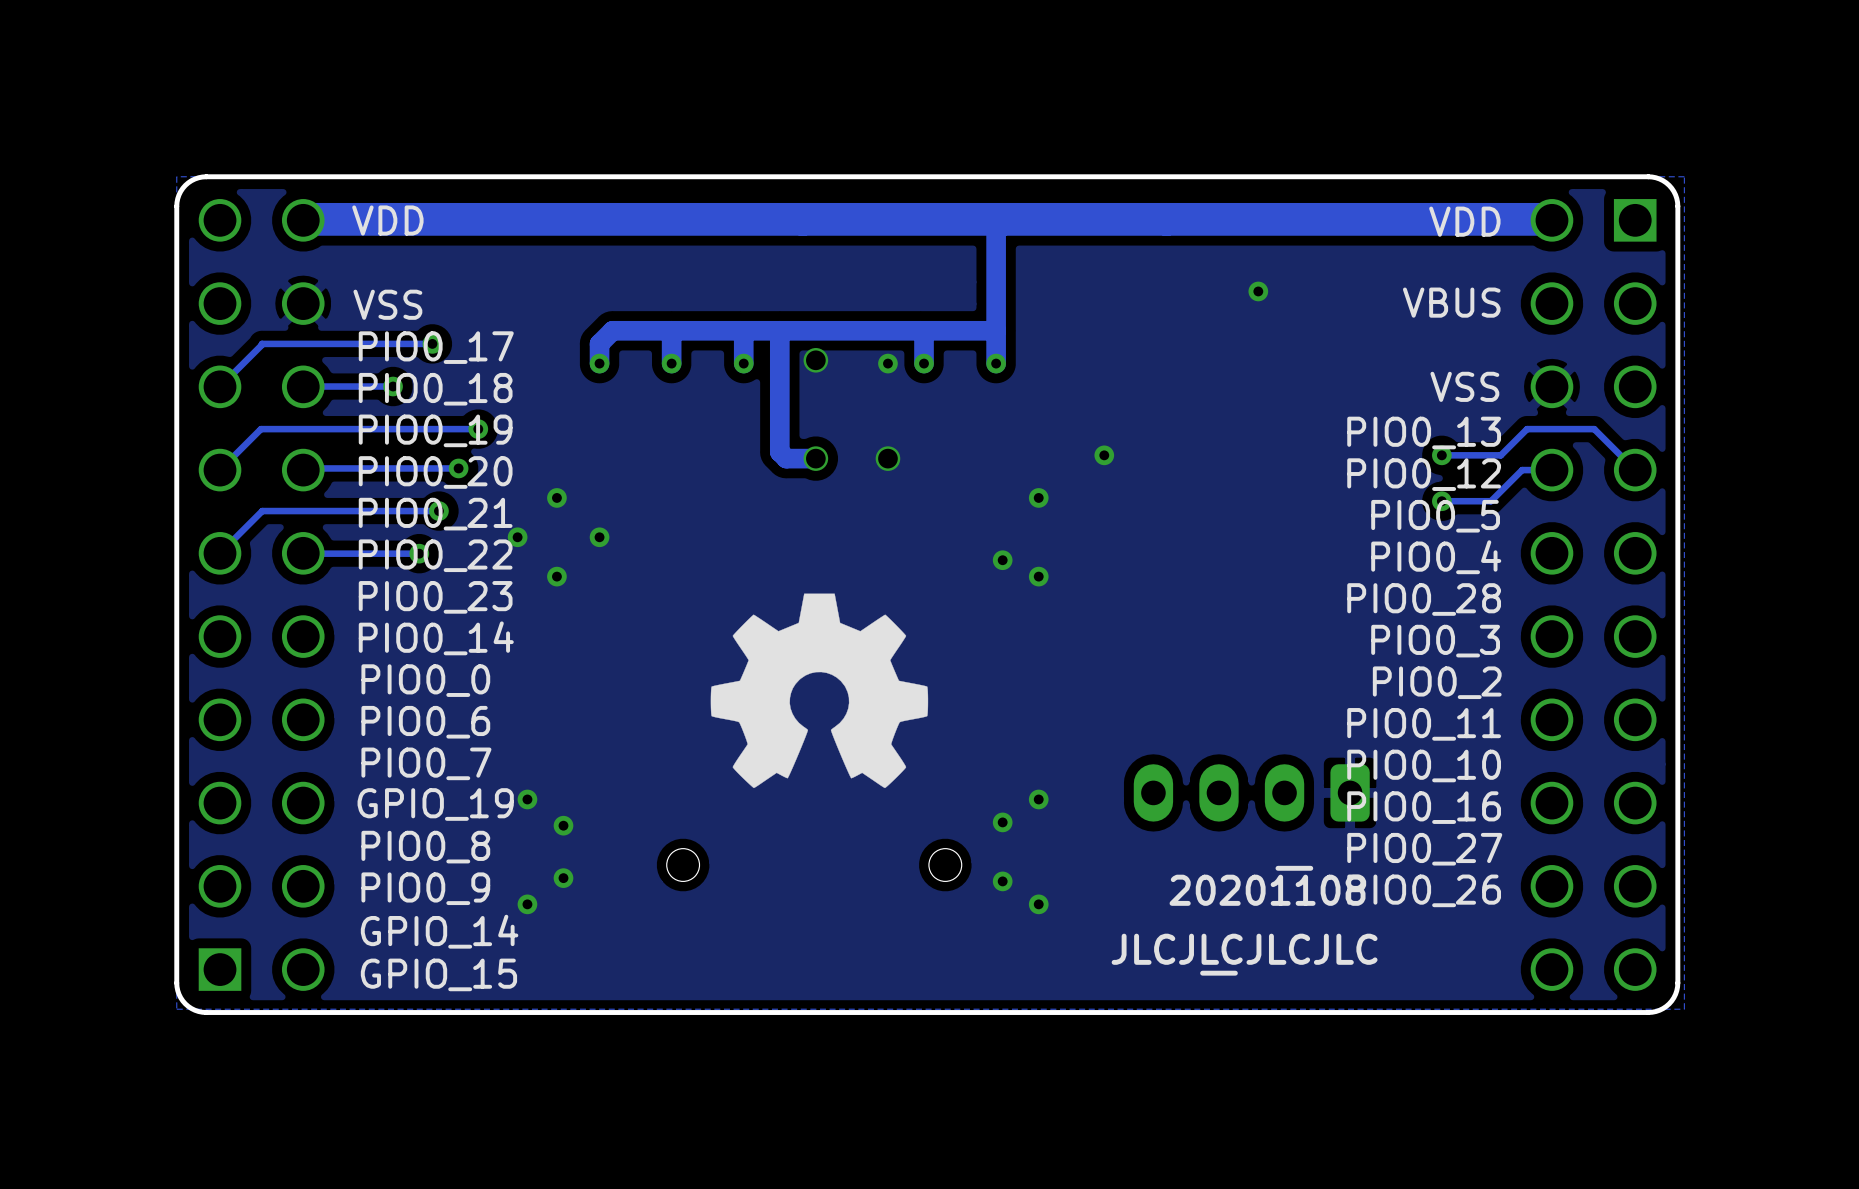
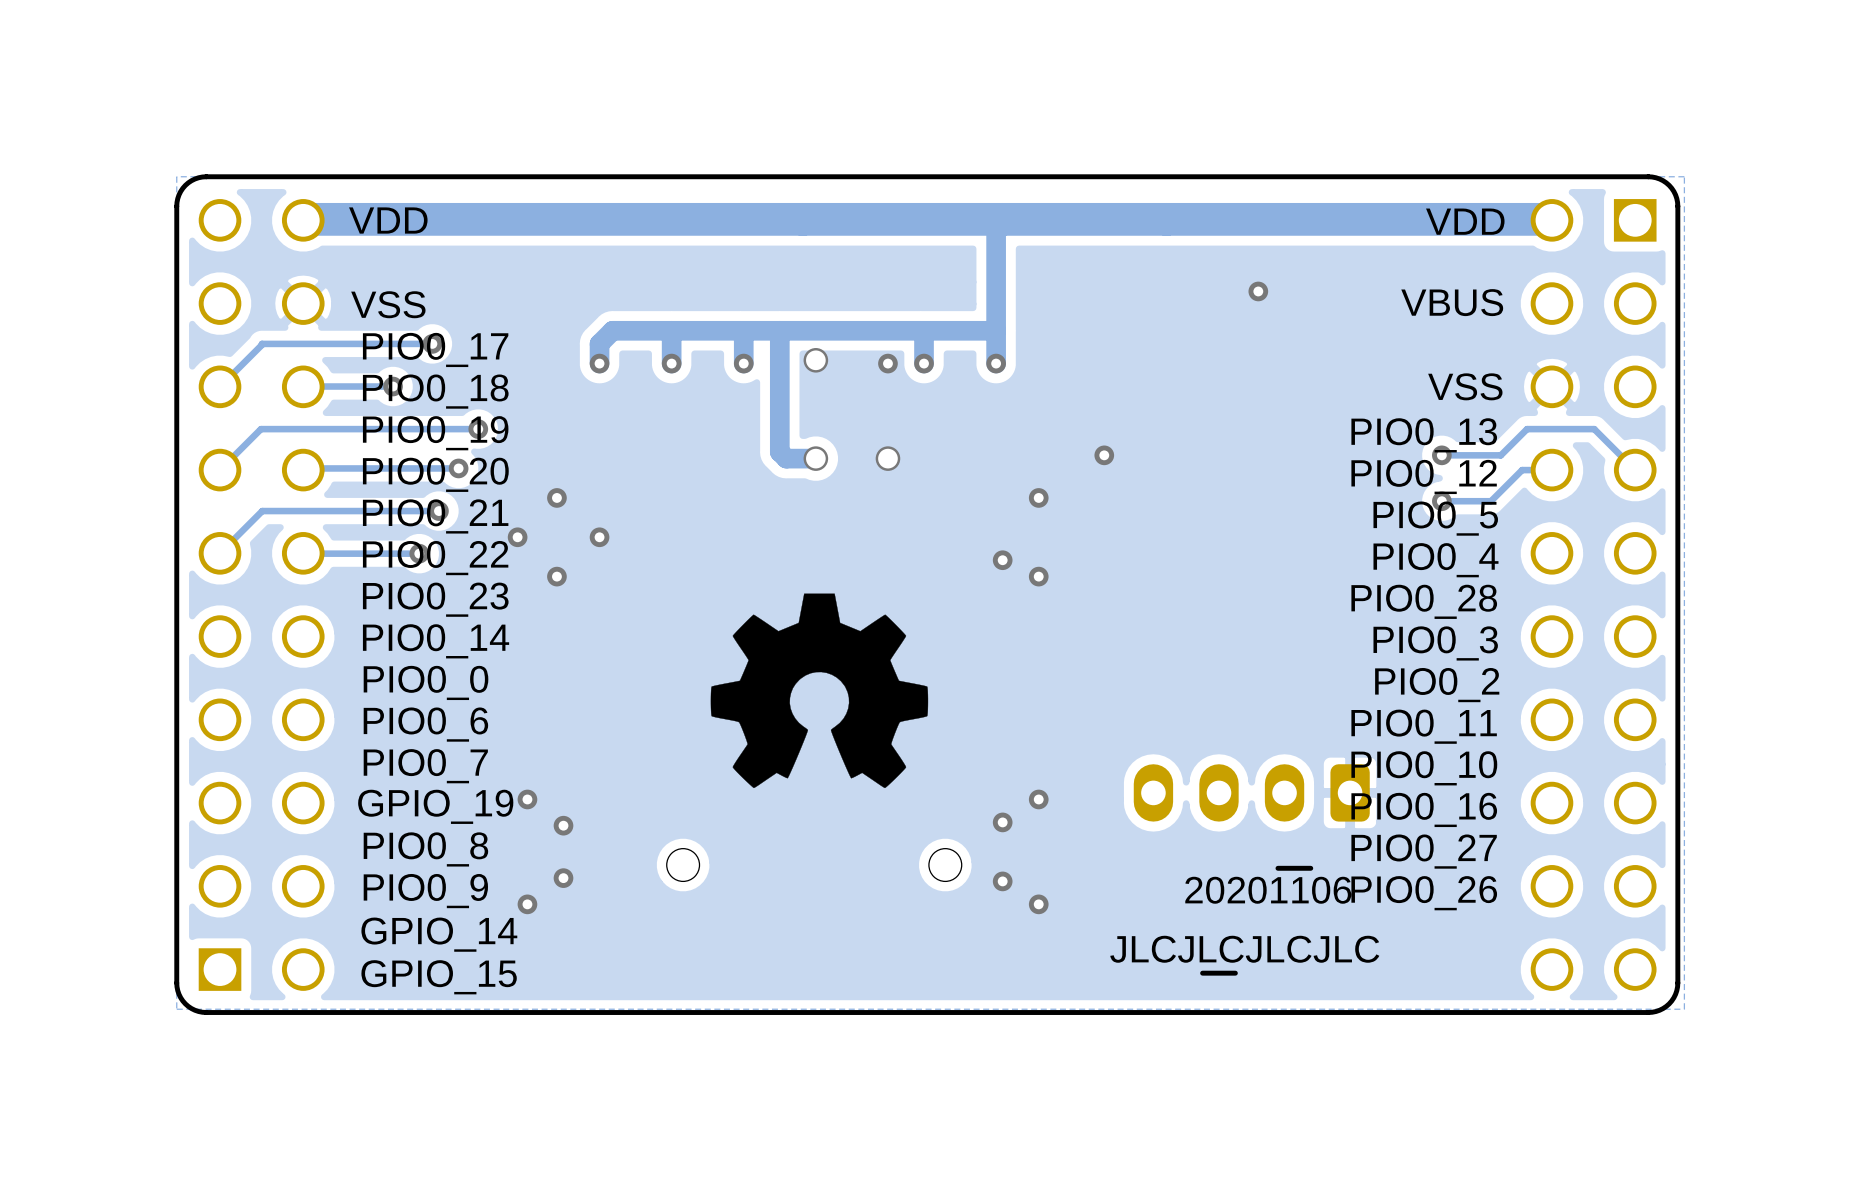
drawing shape: [1169, 865, 1366, 906] -> [1185, 865, 1352, 904]

